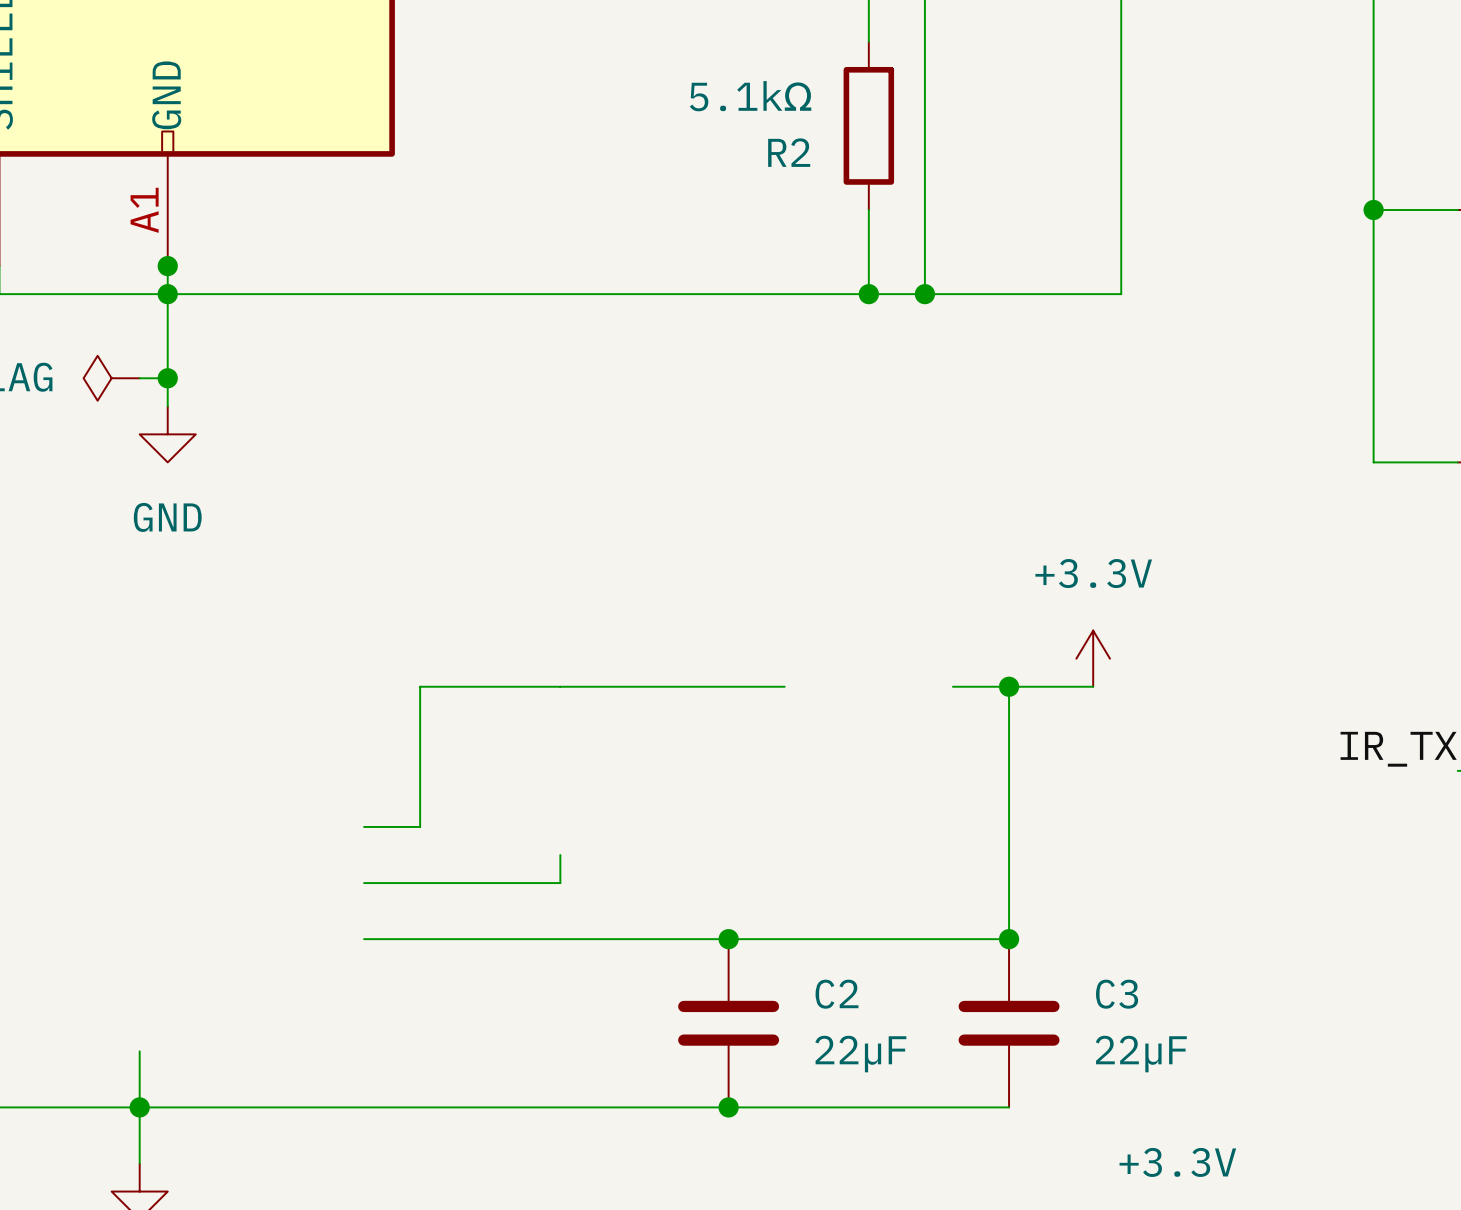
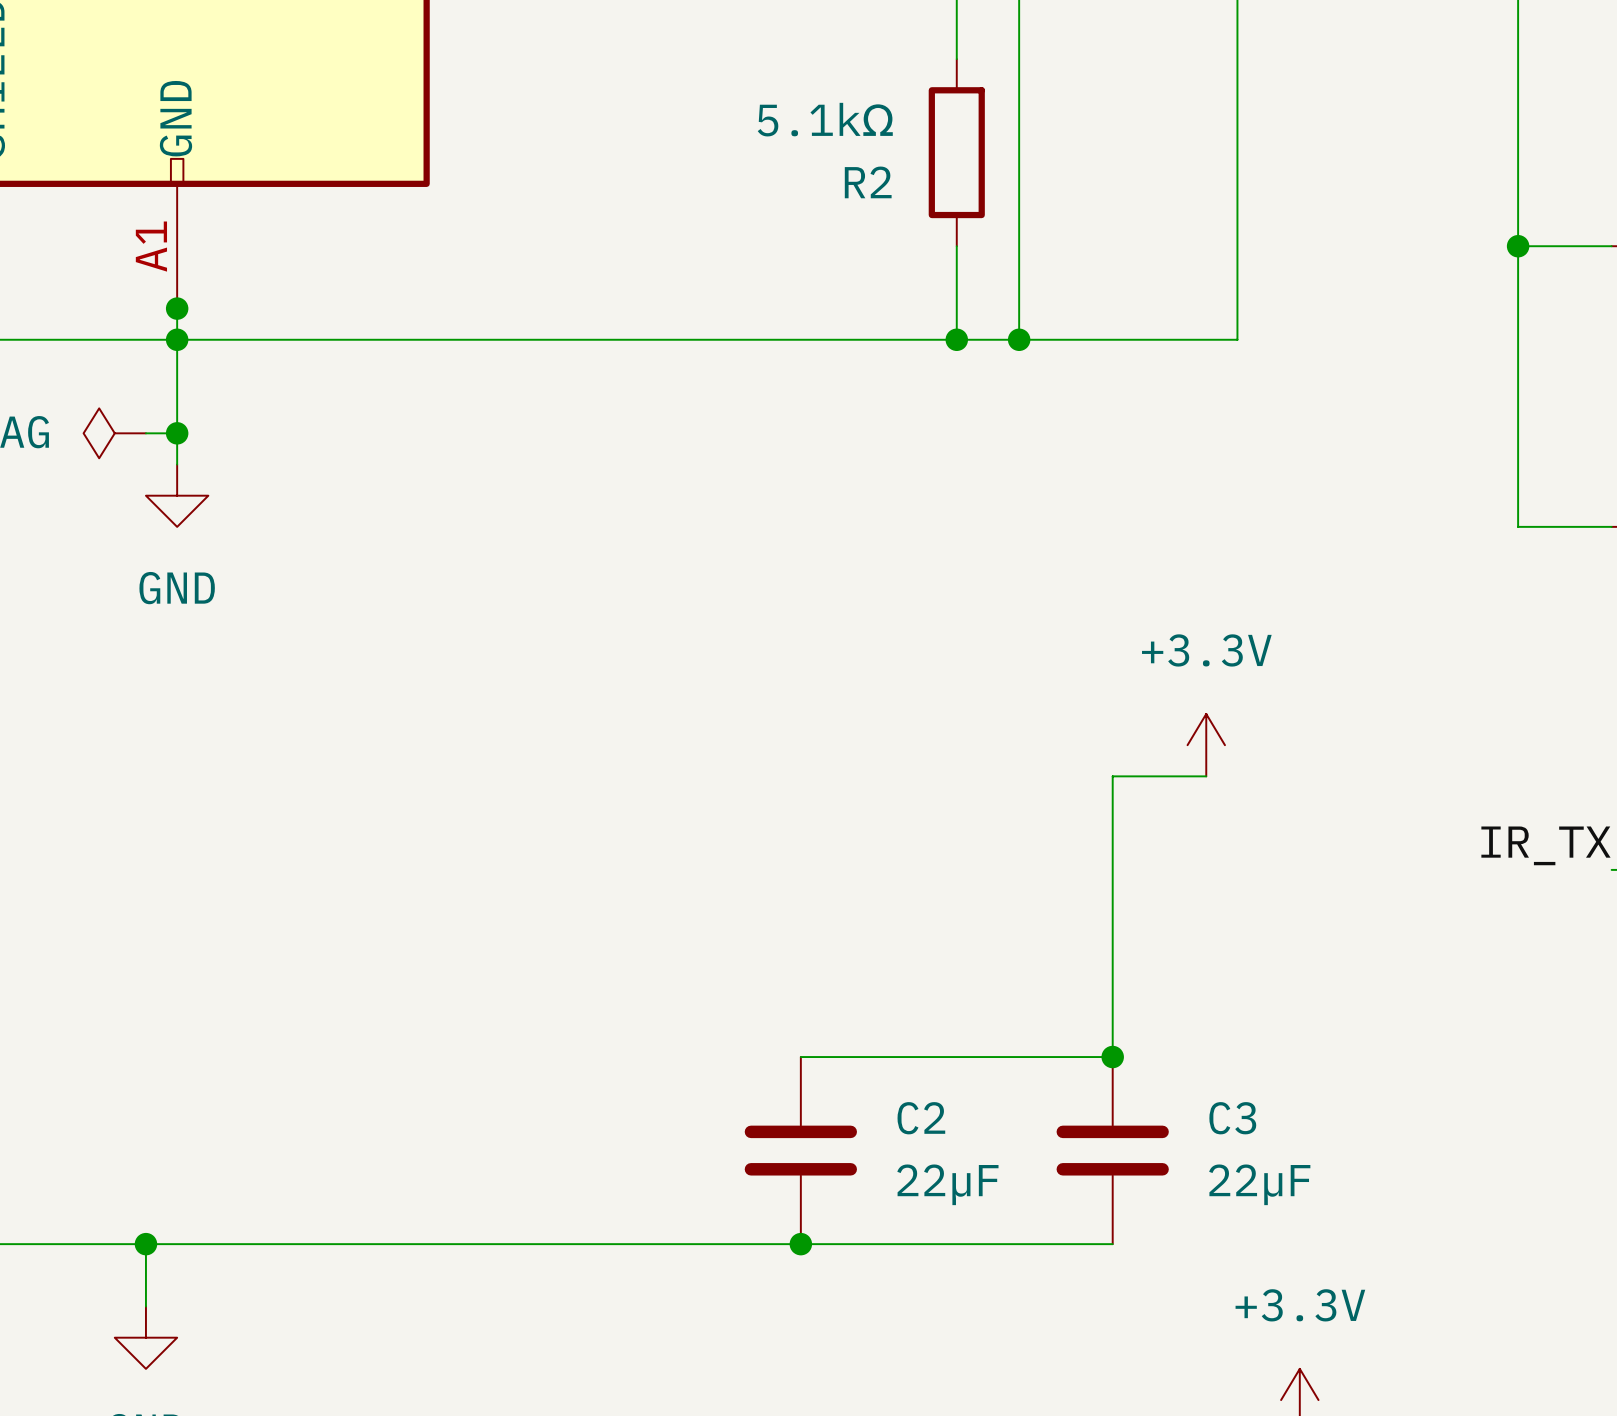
wire: (784, 686) (420, 686) (420, 826) (364, 826) -> none
wire: (952, 686) (1009, 686) -> none
junction: (1009, 686) -> none
wire: (560, 855) (560, 883) (364, 883) -> none
wire: (364, 939) (728, 939) -> none
junction: (728, 939) -> none
wire: (139, 1051) (139, 1107) -> none

